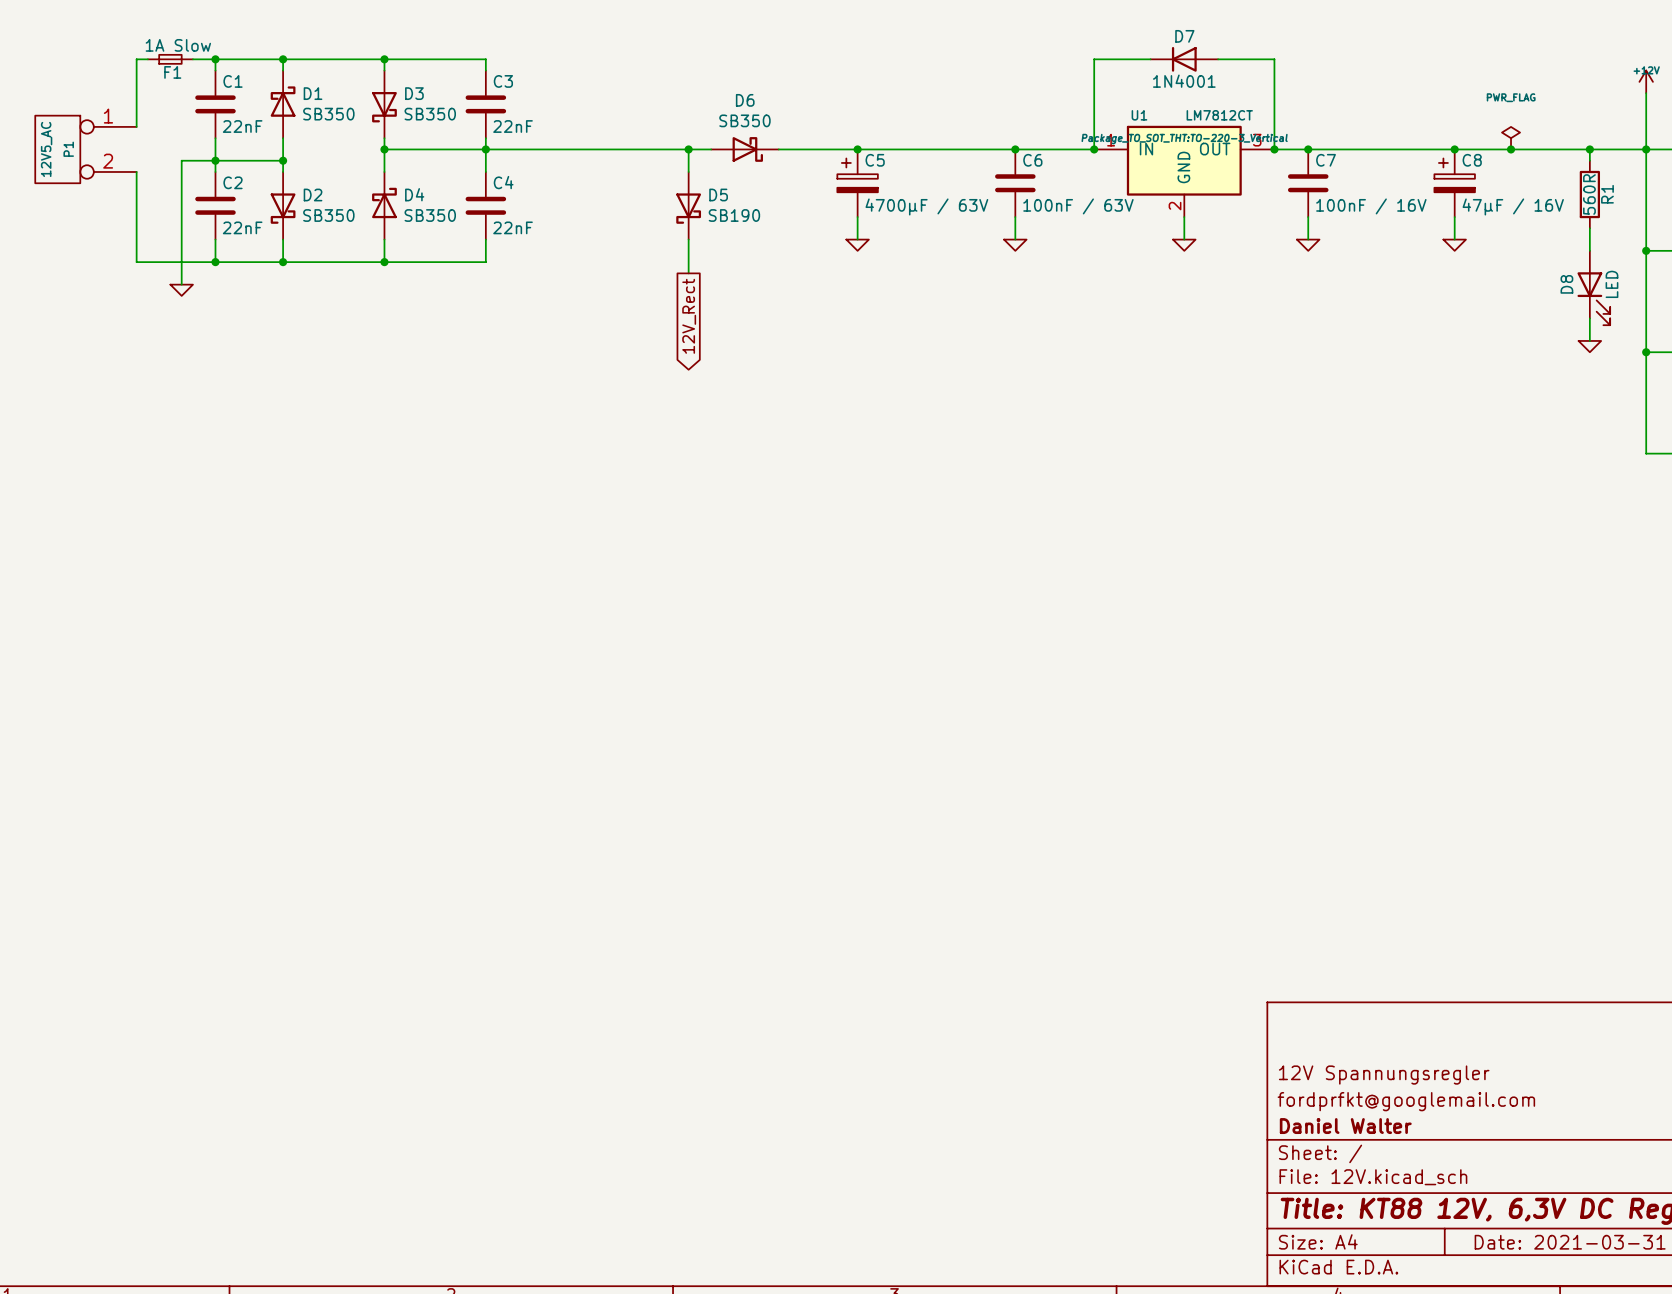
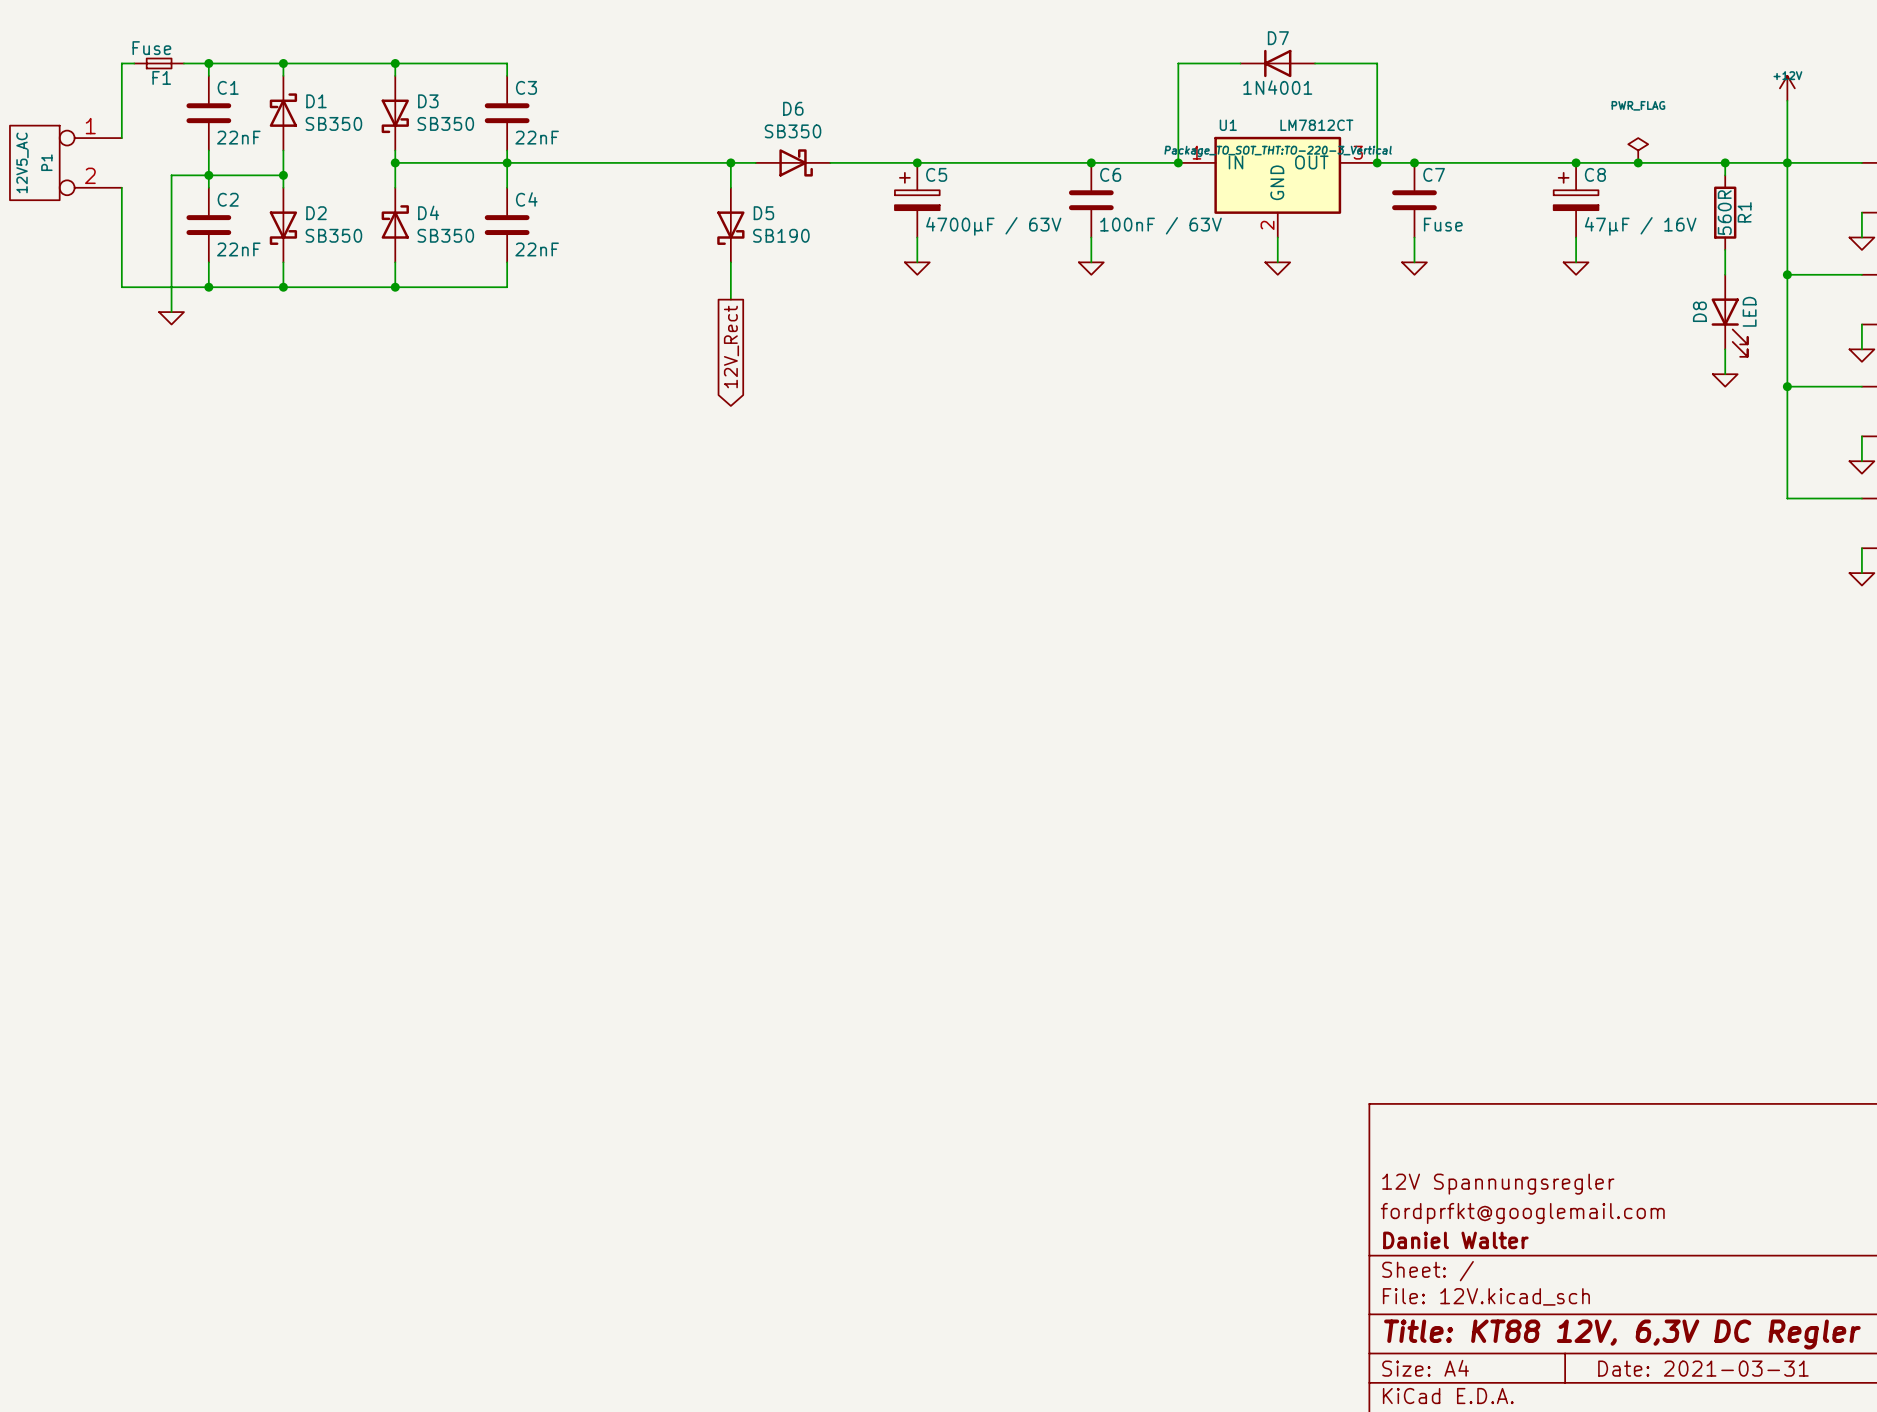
F1 value: 1A Slow (178, 45) -> Fuse (151, 48)
C7 value: 100nF / 16V (1371, 206) -> Fuse (1443, 224)

